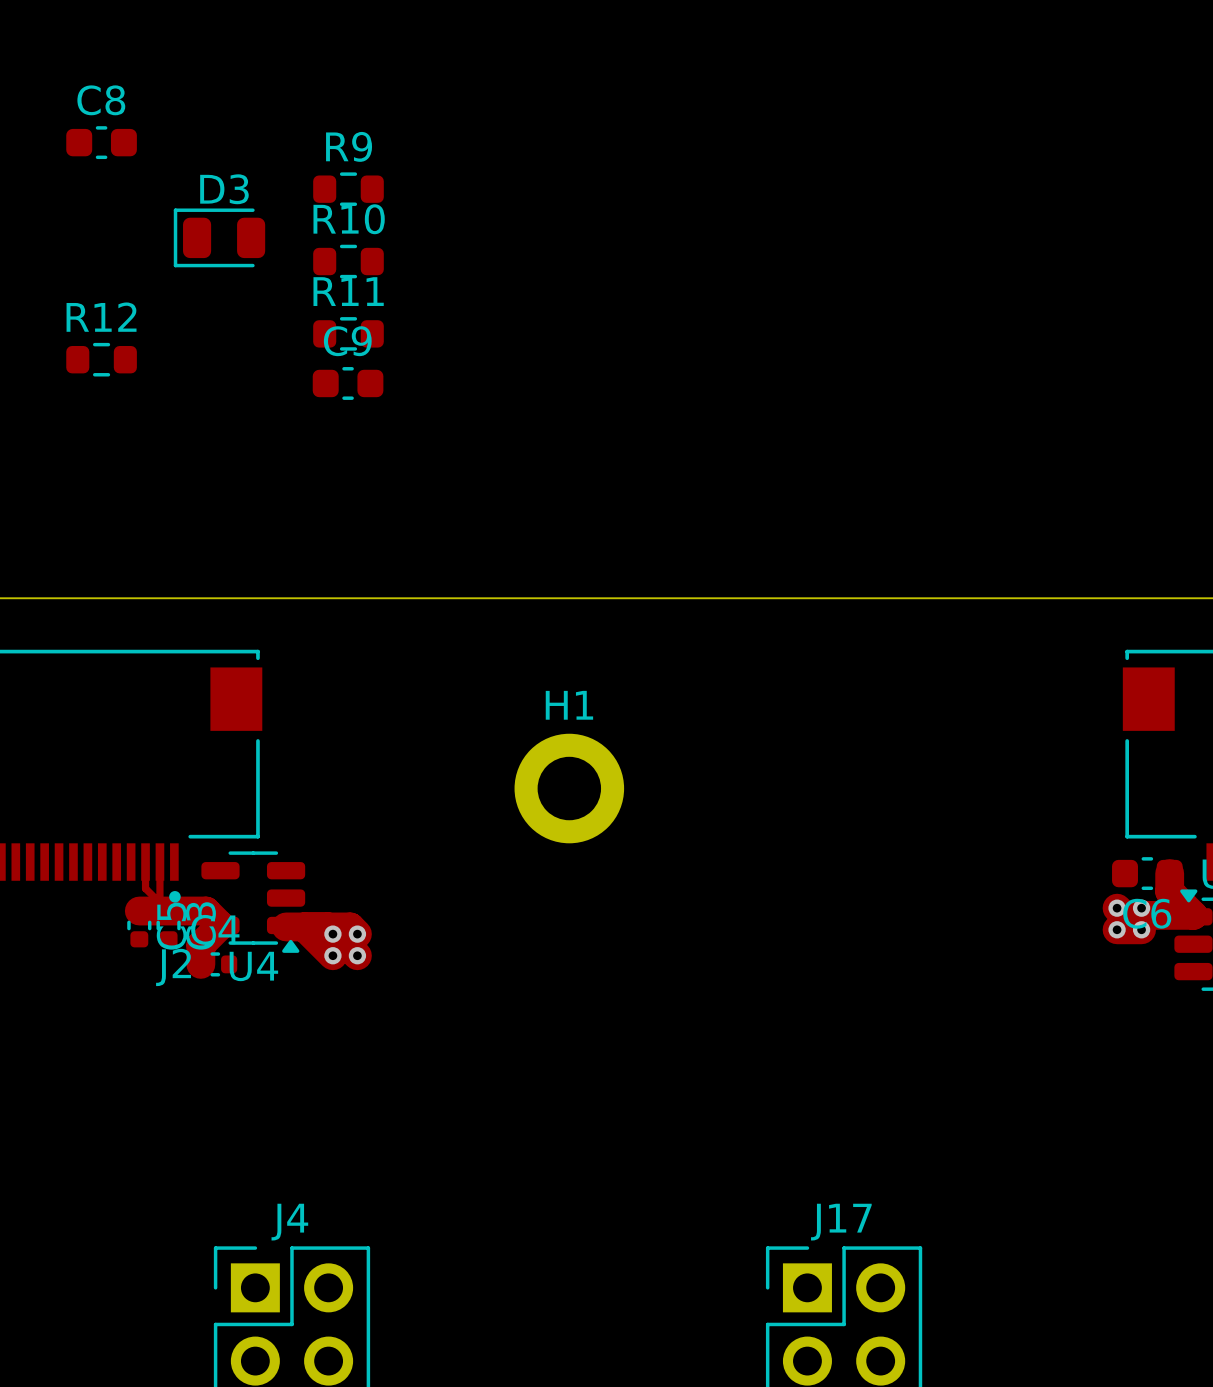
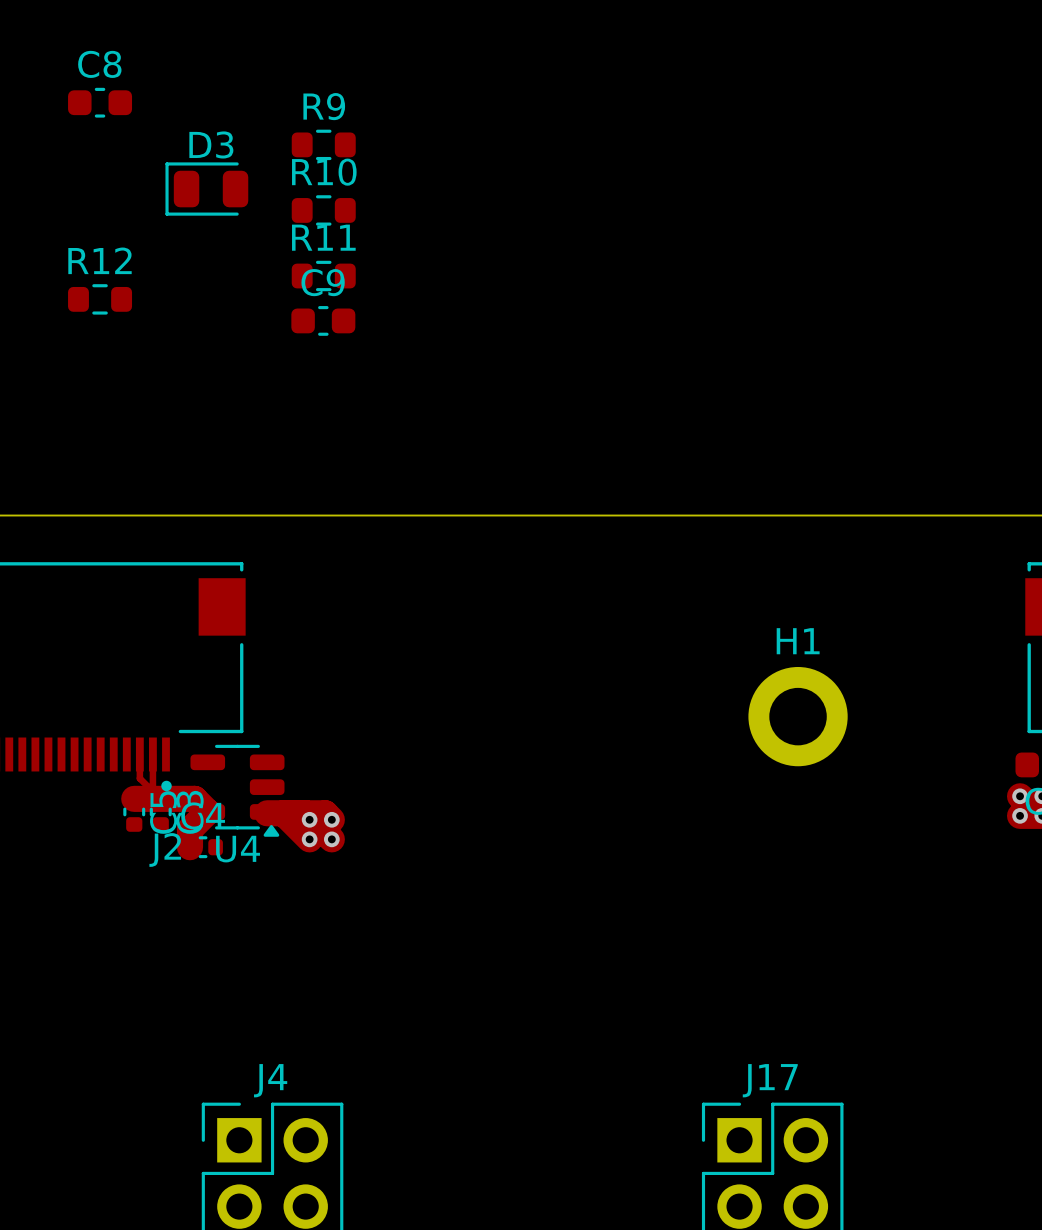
H1 position: (569, 788) -> (798, 716)

